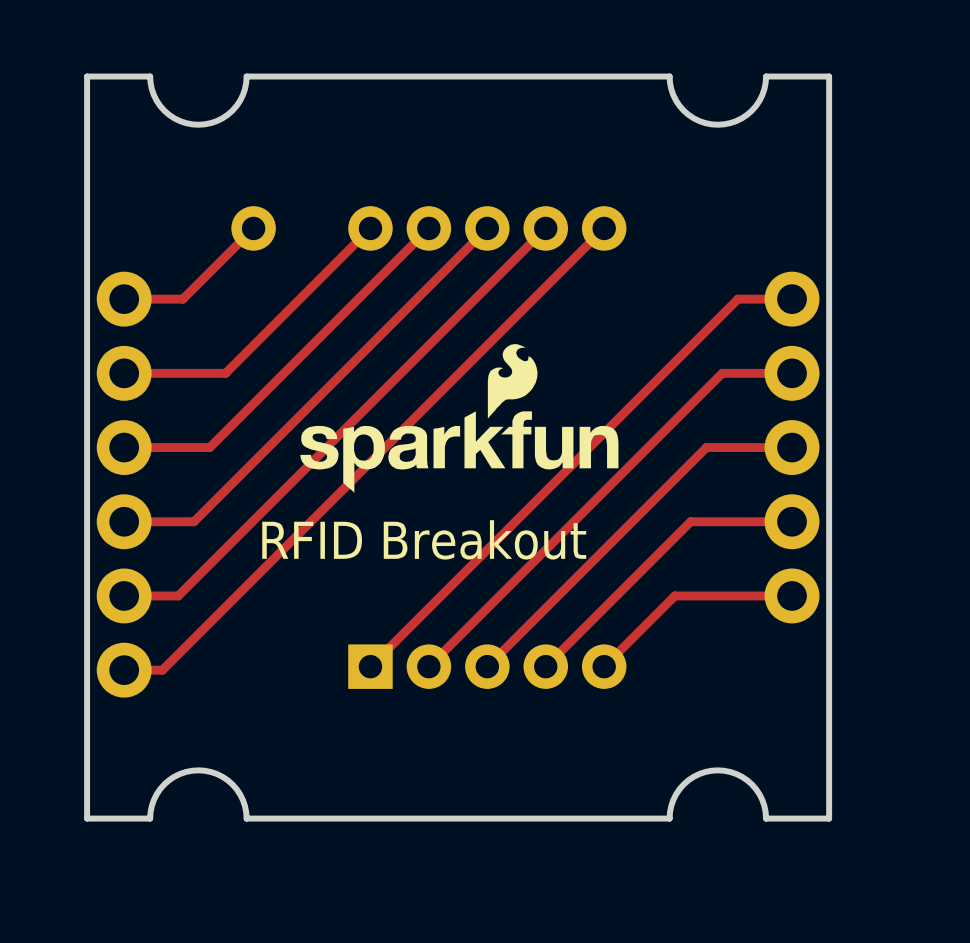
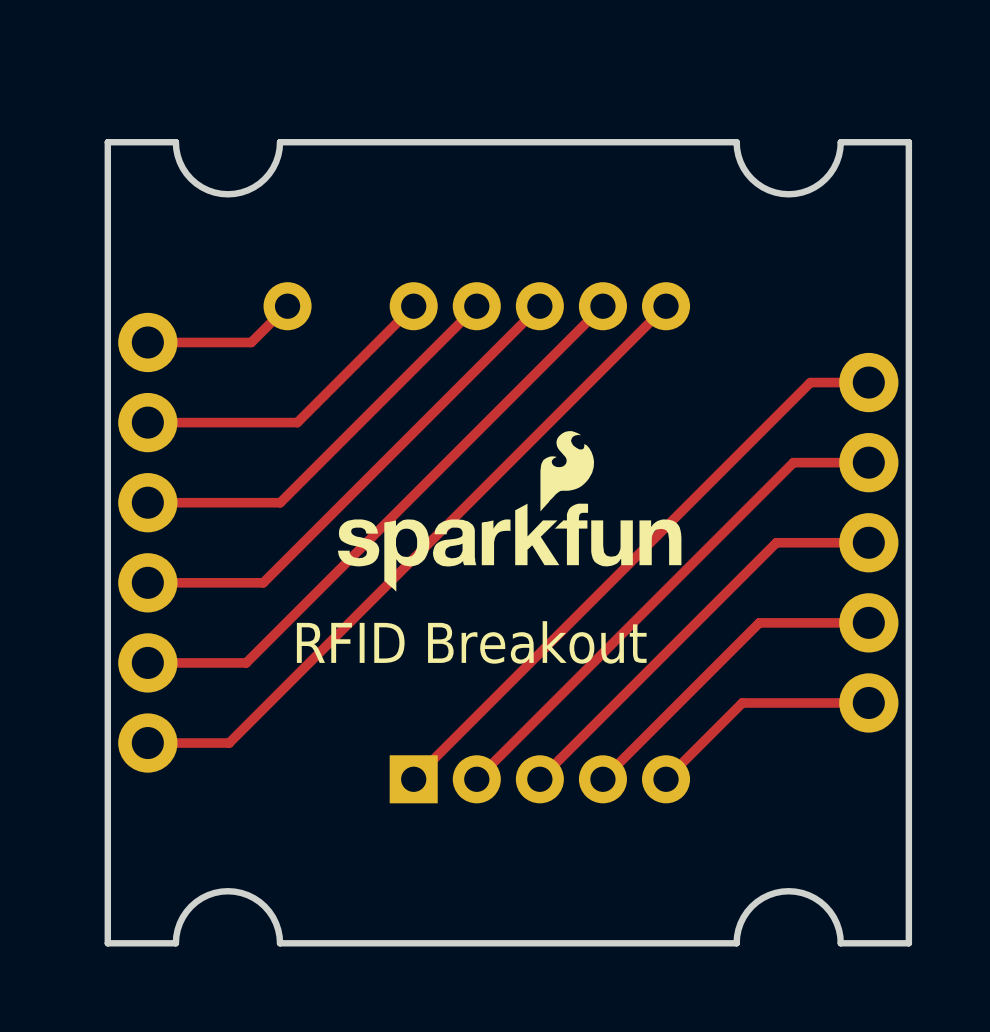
top track: (220, 262) (182, 299) (124, 299) -> (251, 342) (147, 342)
top track: (262, 336) (225, 373) (124, 373) -> (297, 422) (147, 422)
top track: (246, 410) (209, 447) (124, 447) -> (280, 502) (147, 502)
part position: (124, 484) -> (147, 542)
top track: (231, 484) (194, 521) (124, 521) -> (263, 582) (147, 582)
top track: (215, 558) (178, 595) (124, 595) -> (246, 662) (147, 662)
top track: (199, 633) (162, 670) (124, 670) -> (229, 743) (147, 743)

